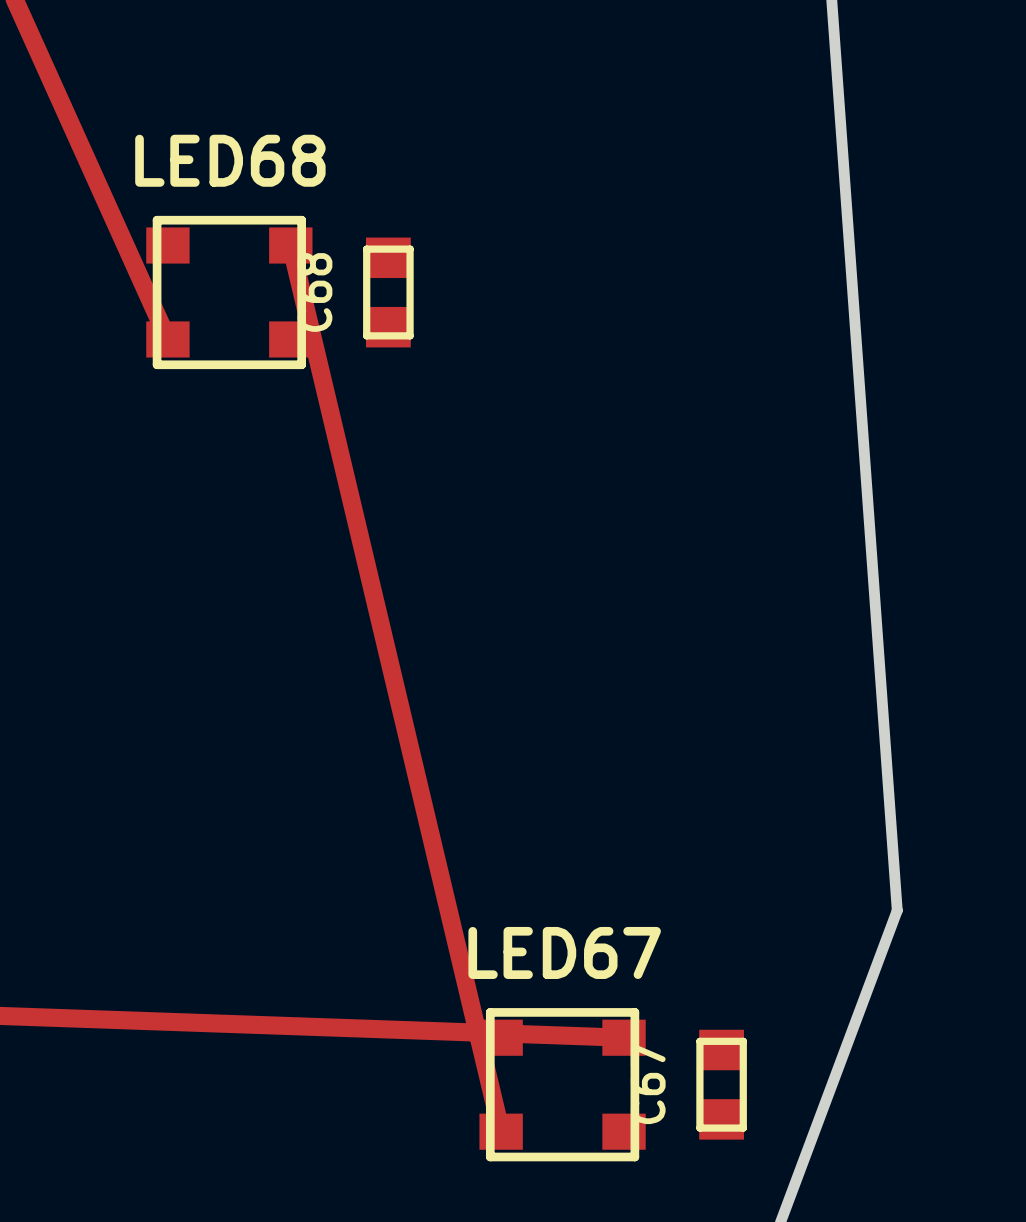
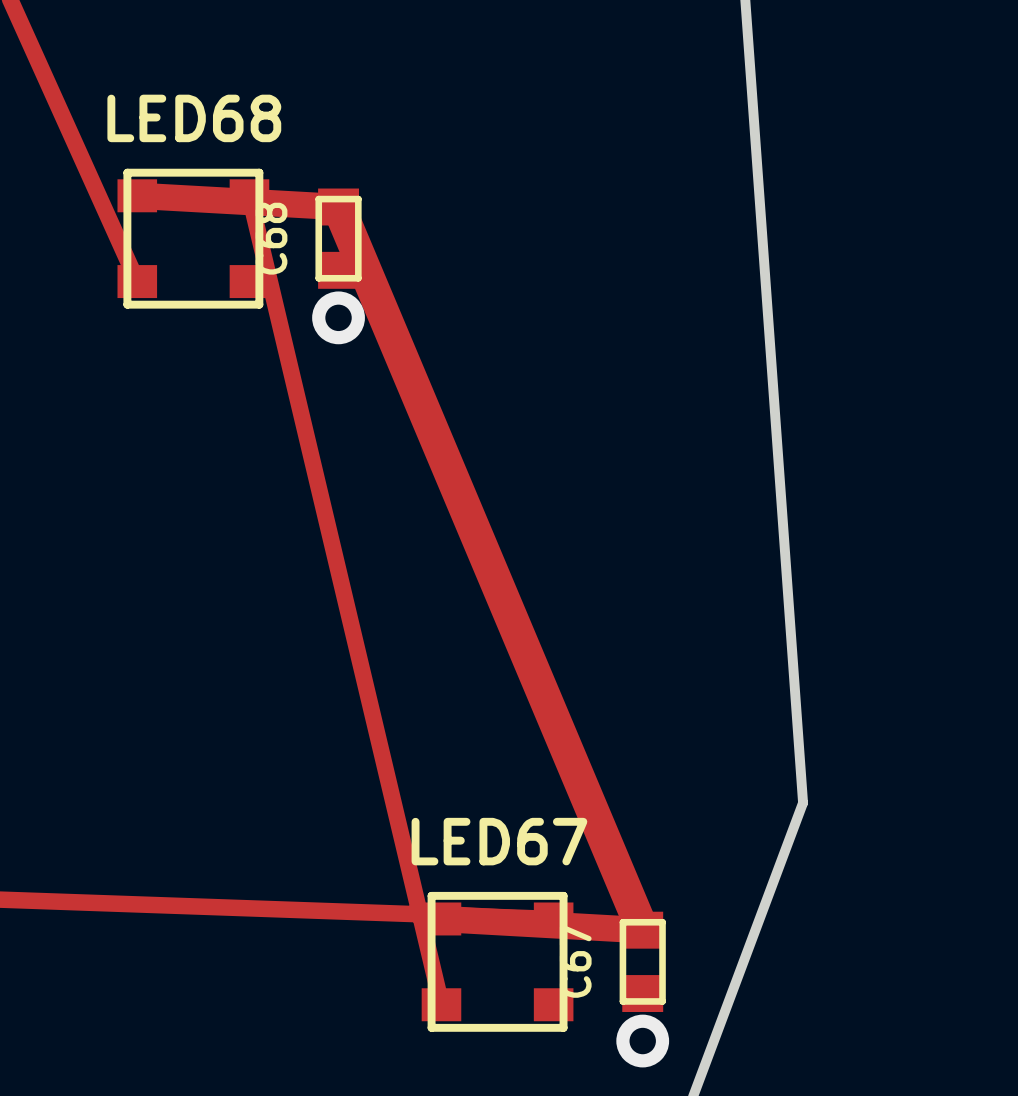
track: none -> (137, 195) (338, 207) (642, 930) (441, 918)
via: none -> (338, 317)
via: none -> (642, 1041)

